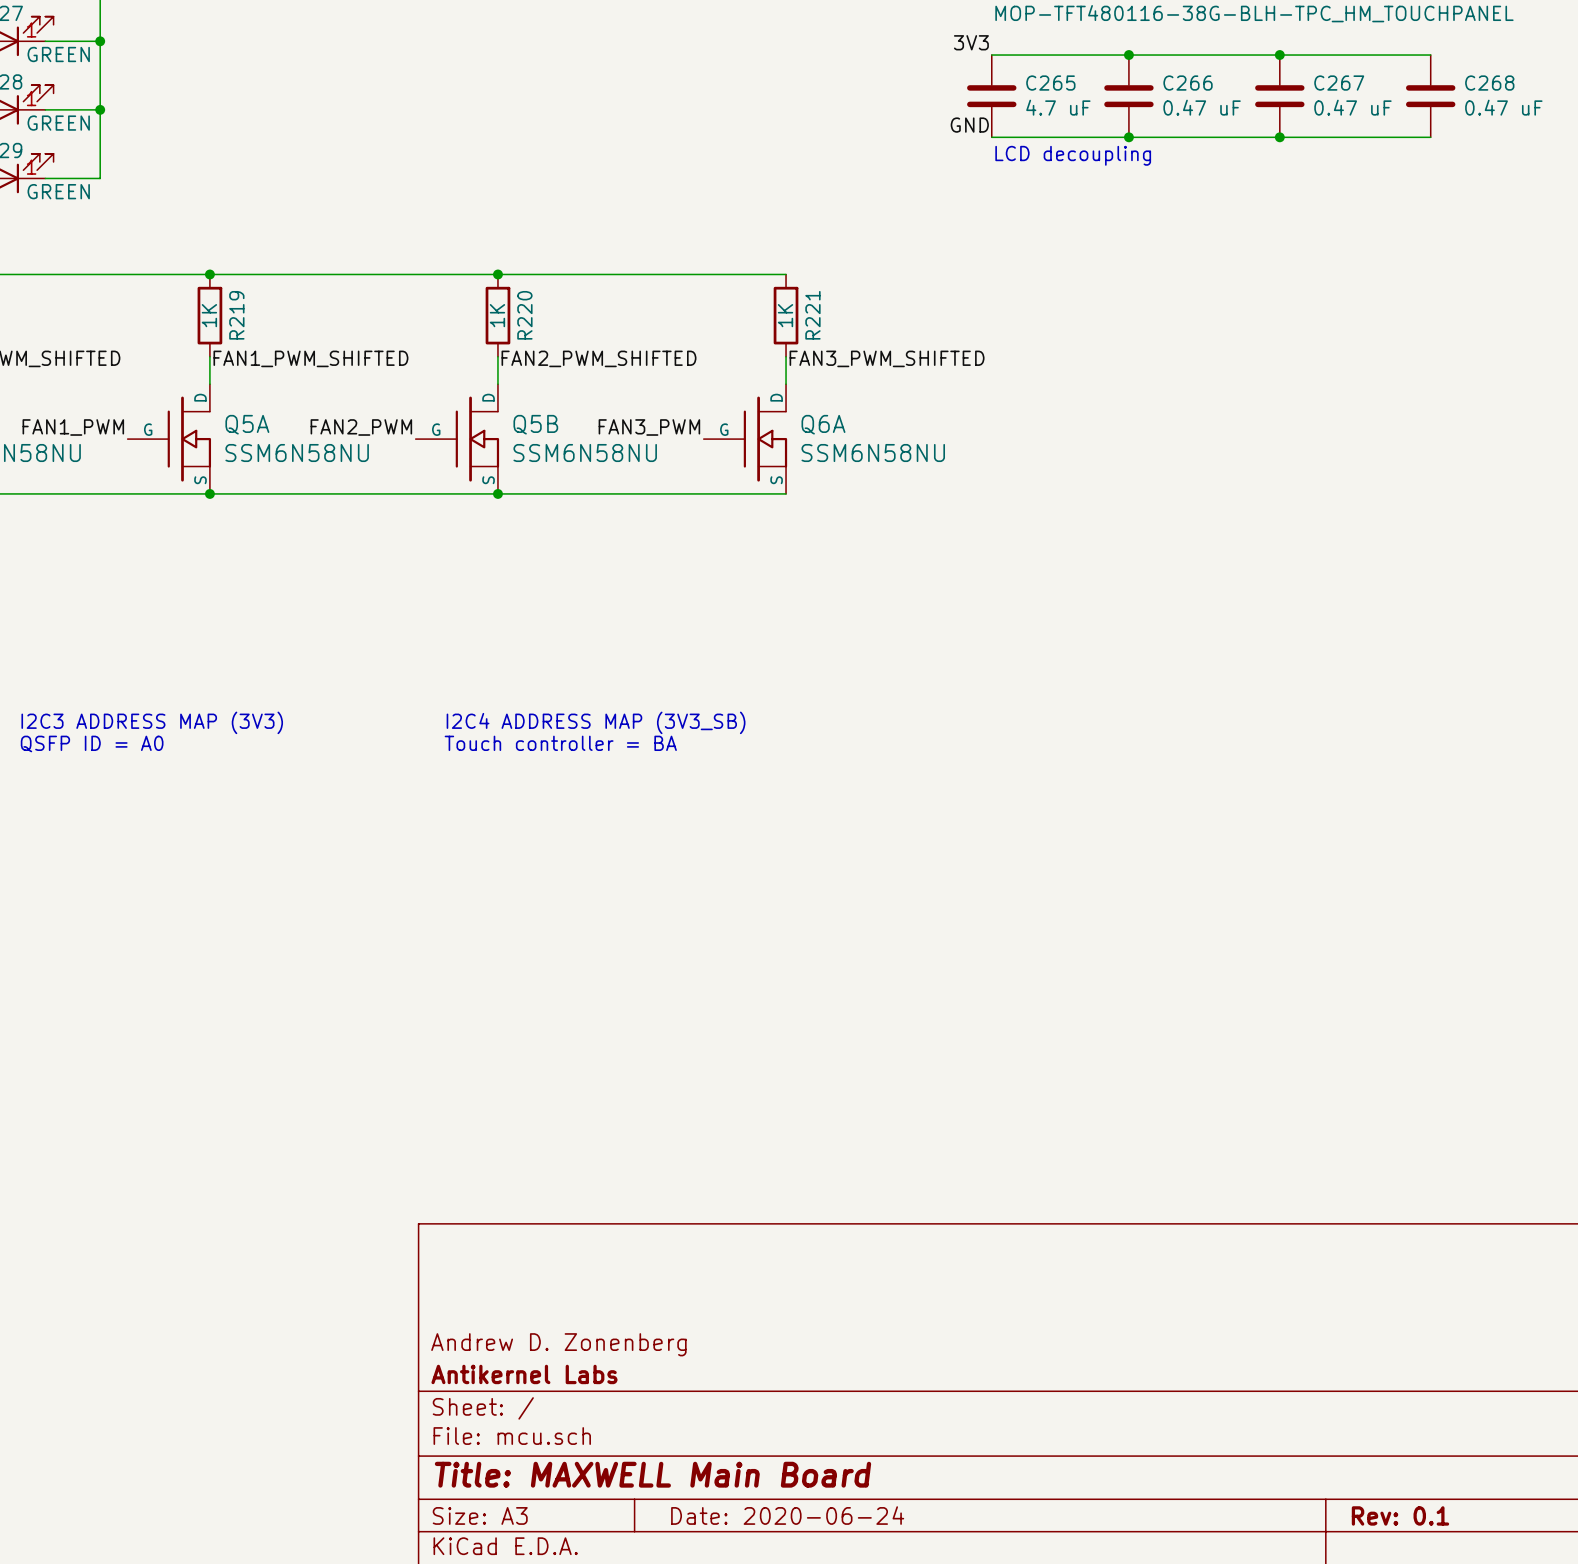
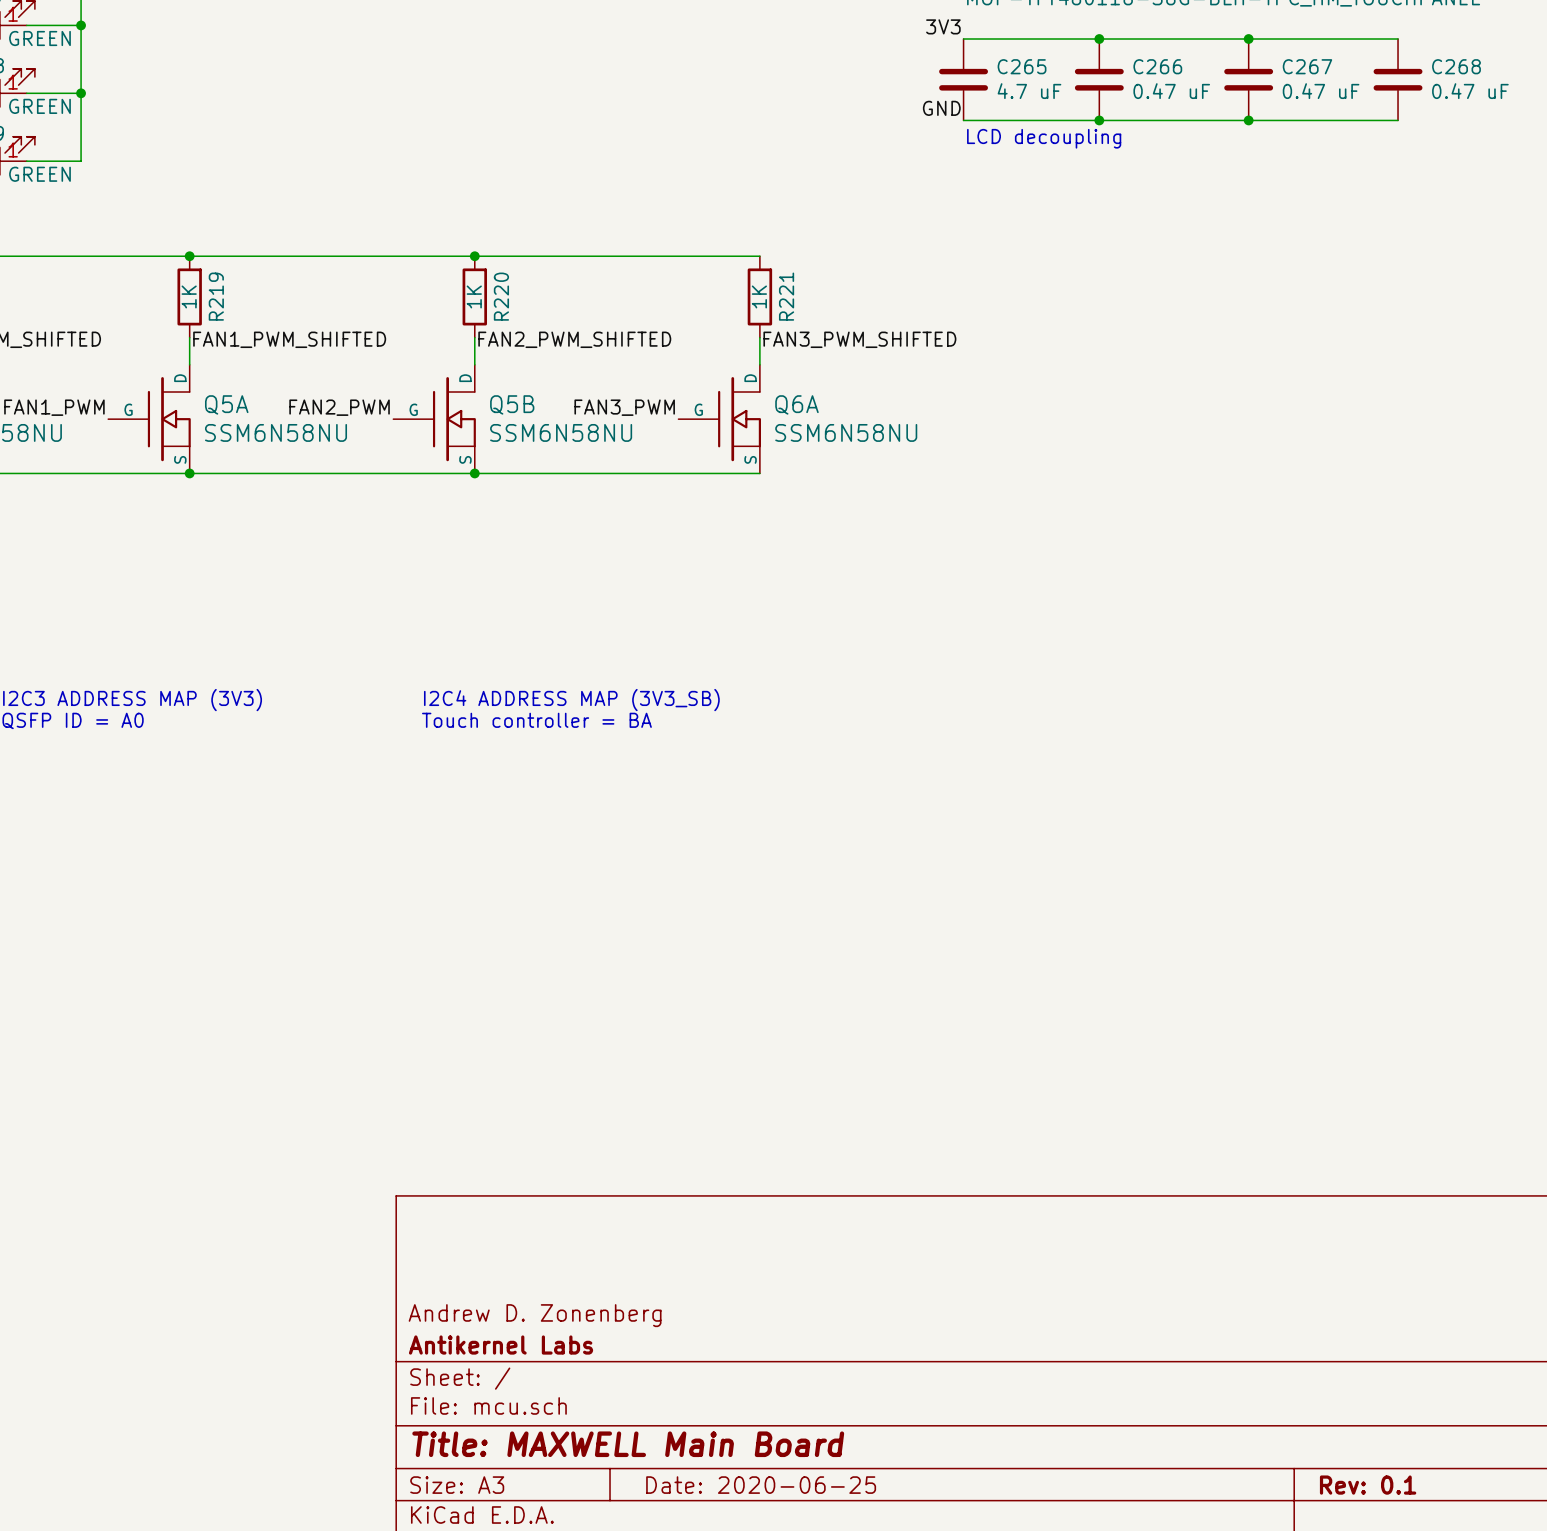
title block: Date: 2020-06-24 (787, 1515) -> Date: 2020-06-25 (761, 1485)

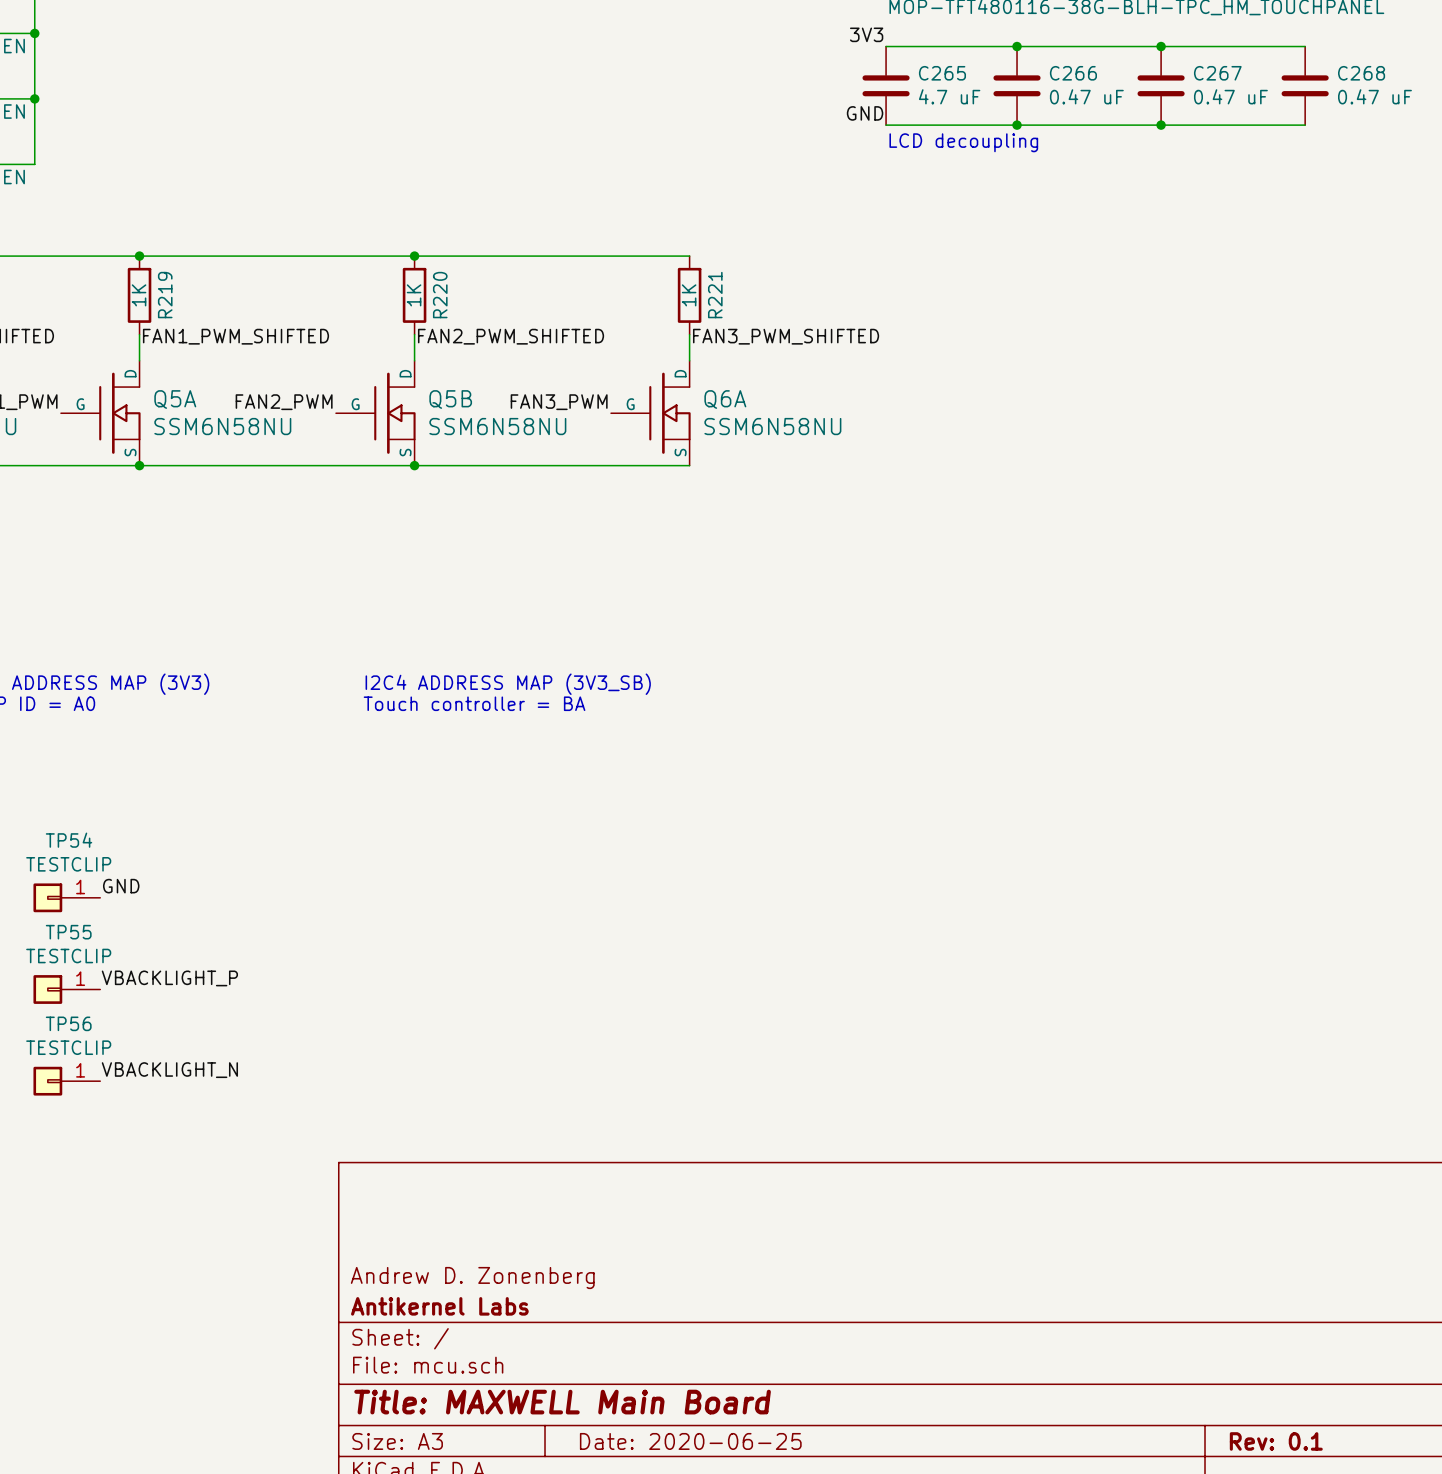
label: none -> GND (121, 886)
TP54: none -> TESTCLIP (66, 897)
label: none -> VBACKLIGHT_P (169, 978)
TP55: none -> TESTCLIP (66, 989)
label: none -> VBACKLIGHT_N (169, 1070)
TP56: none -> TESTCLIP (66, 1081)

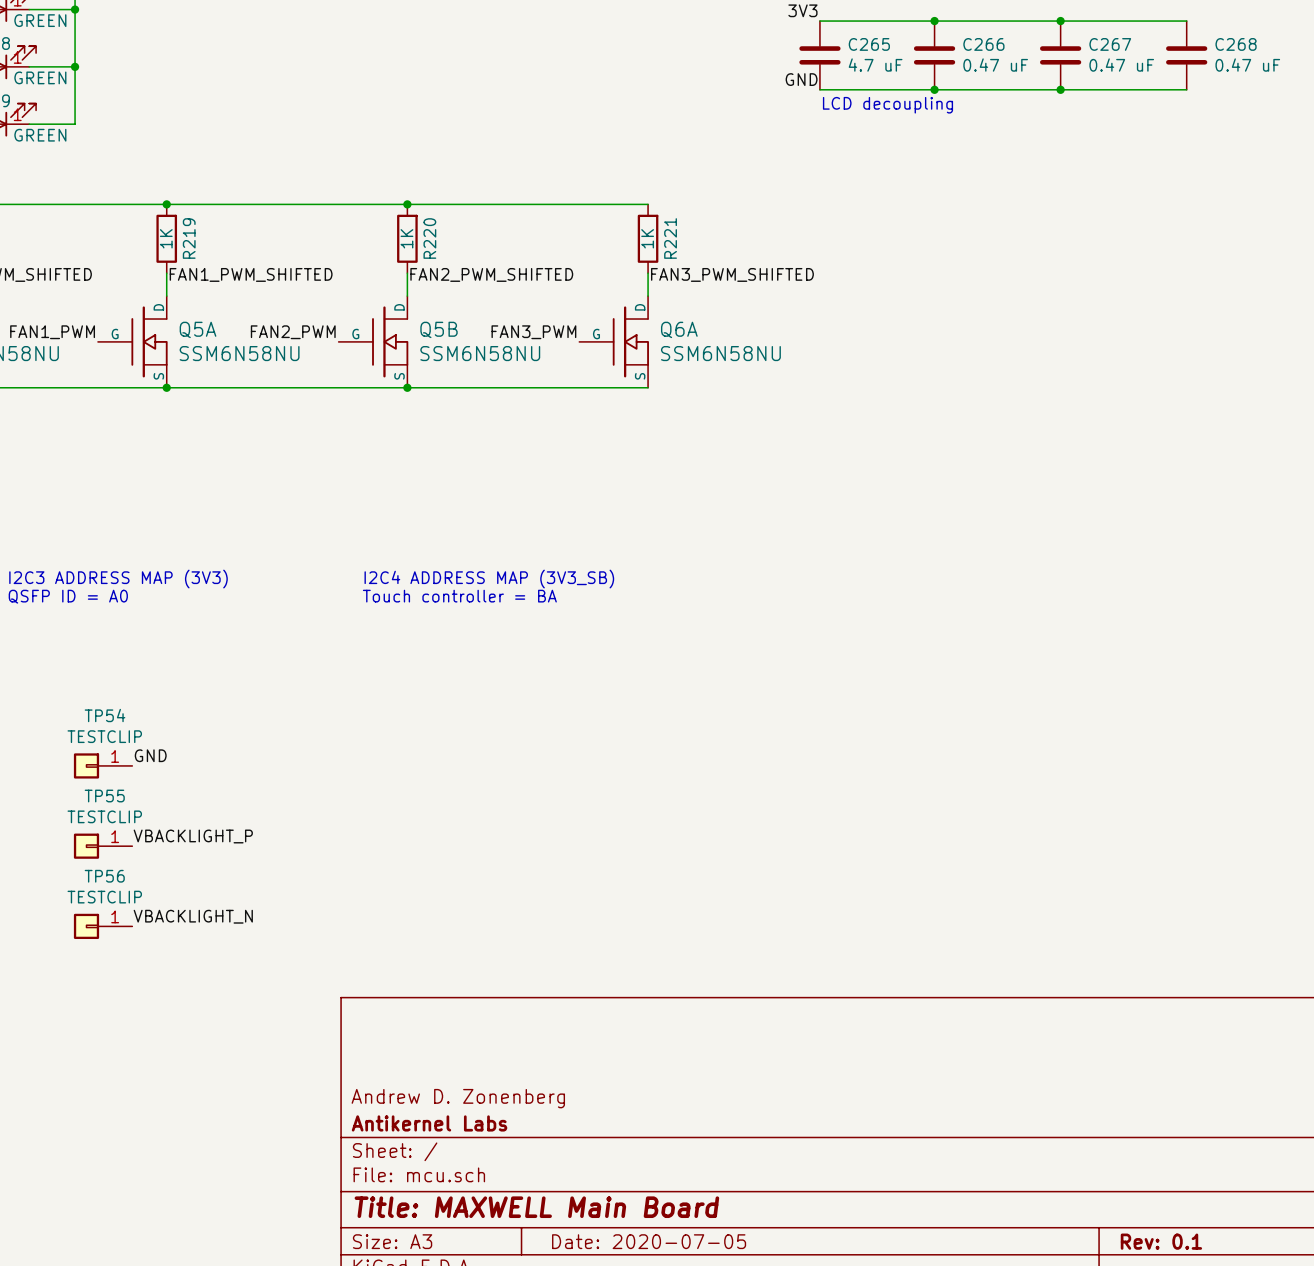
title block: Date: 2020-06-25 (690, 1441) -> Date: 2020-07-05 (649, 1241)

